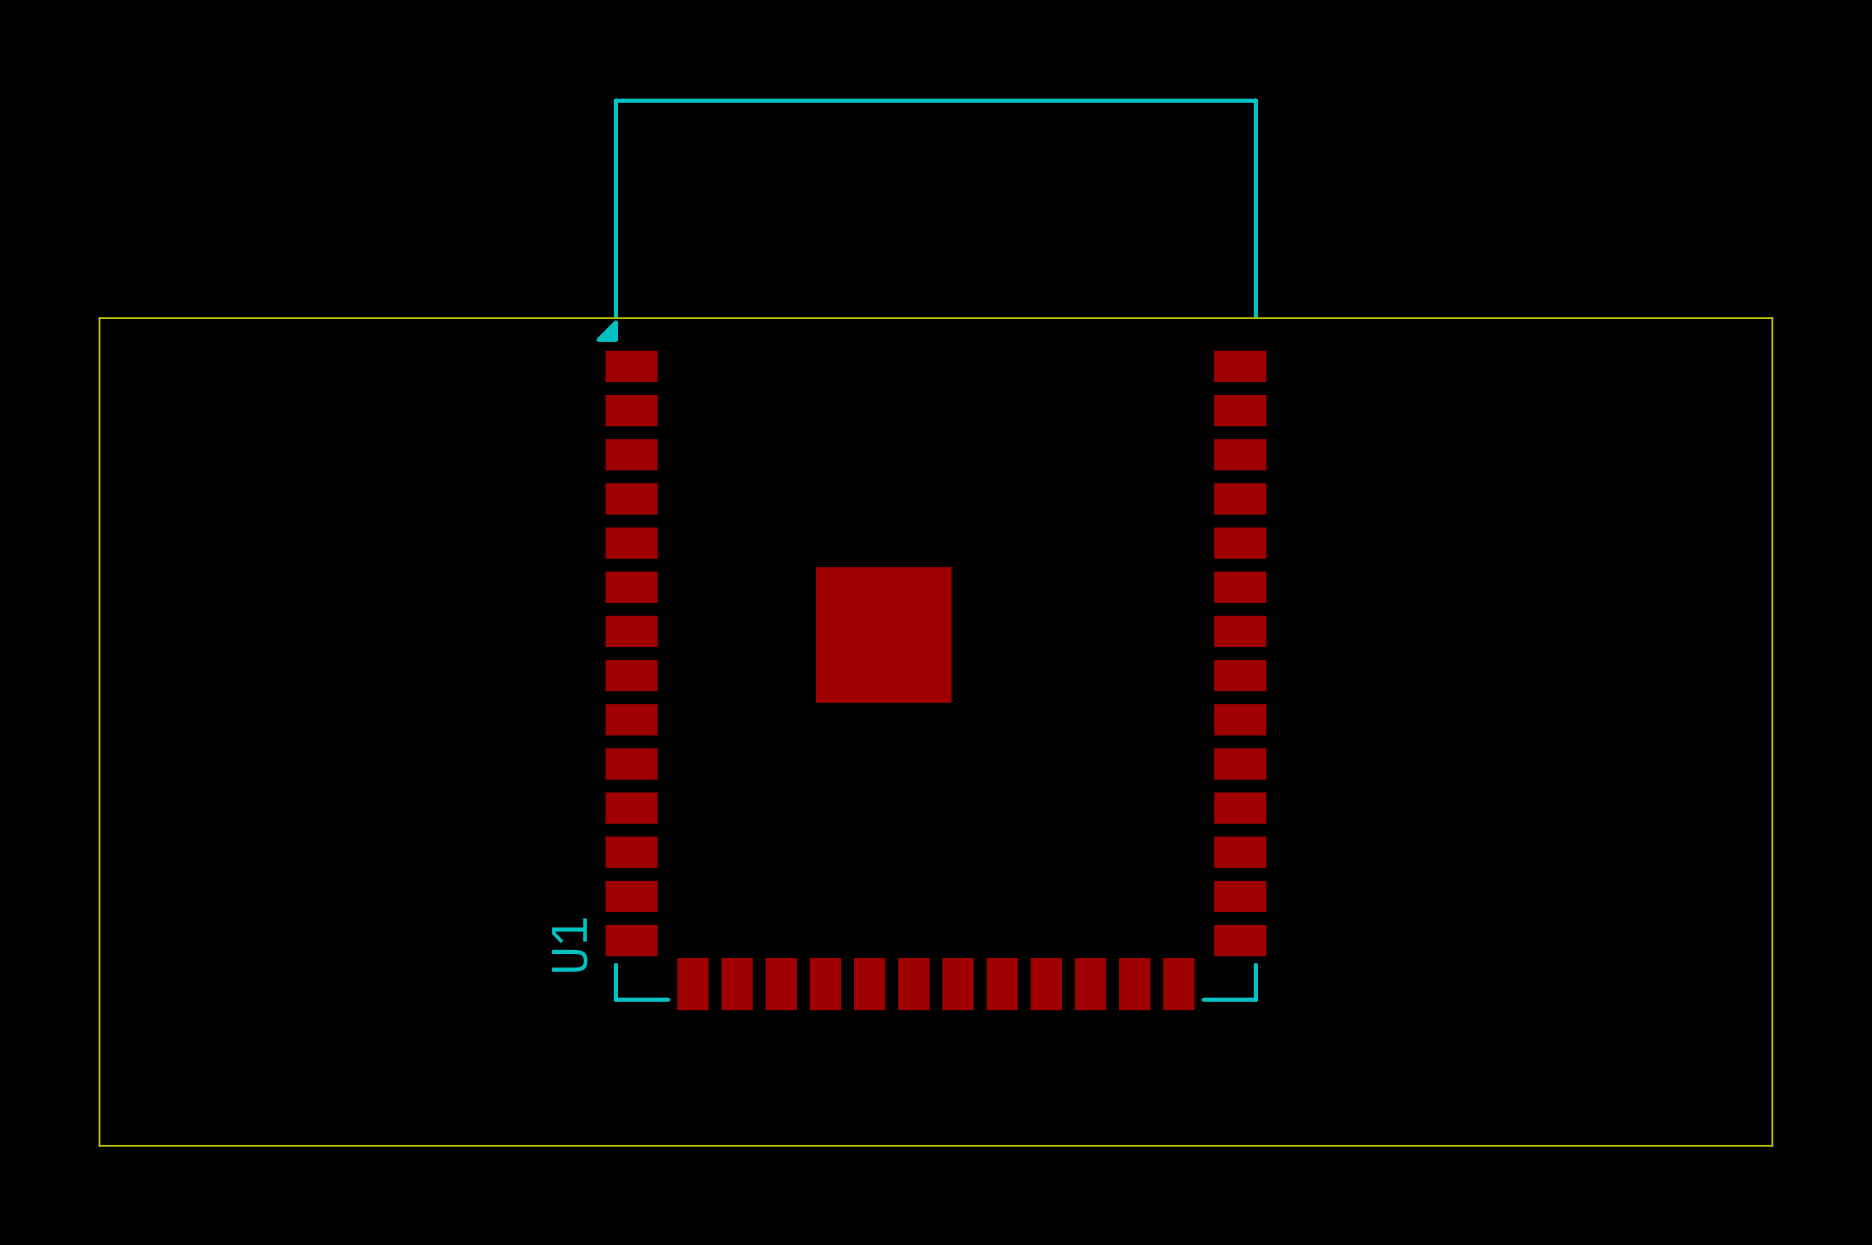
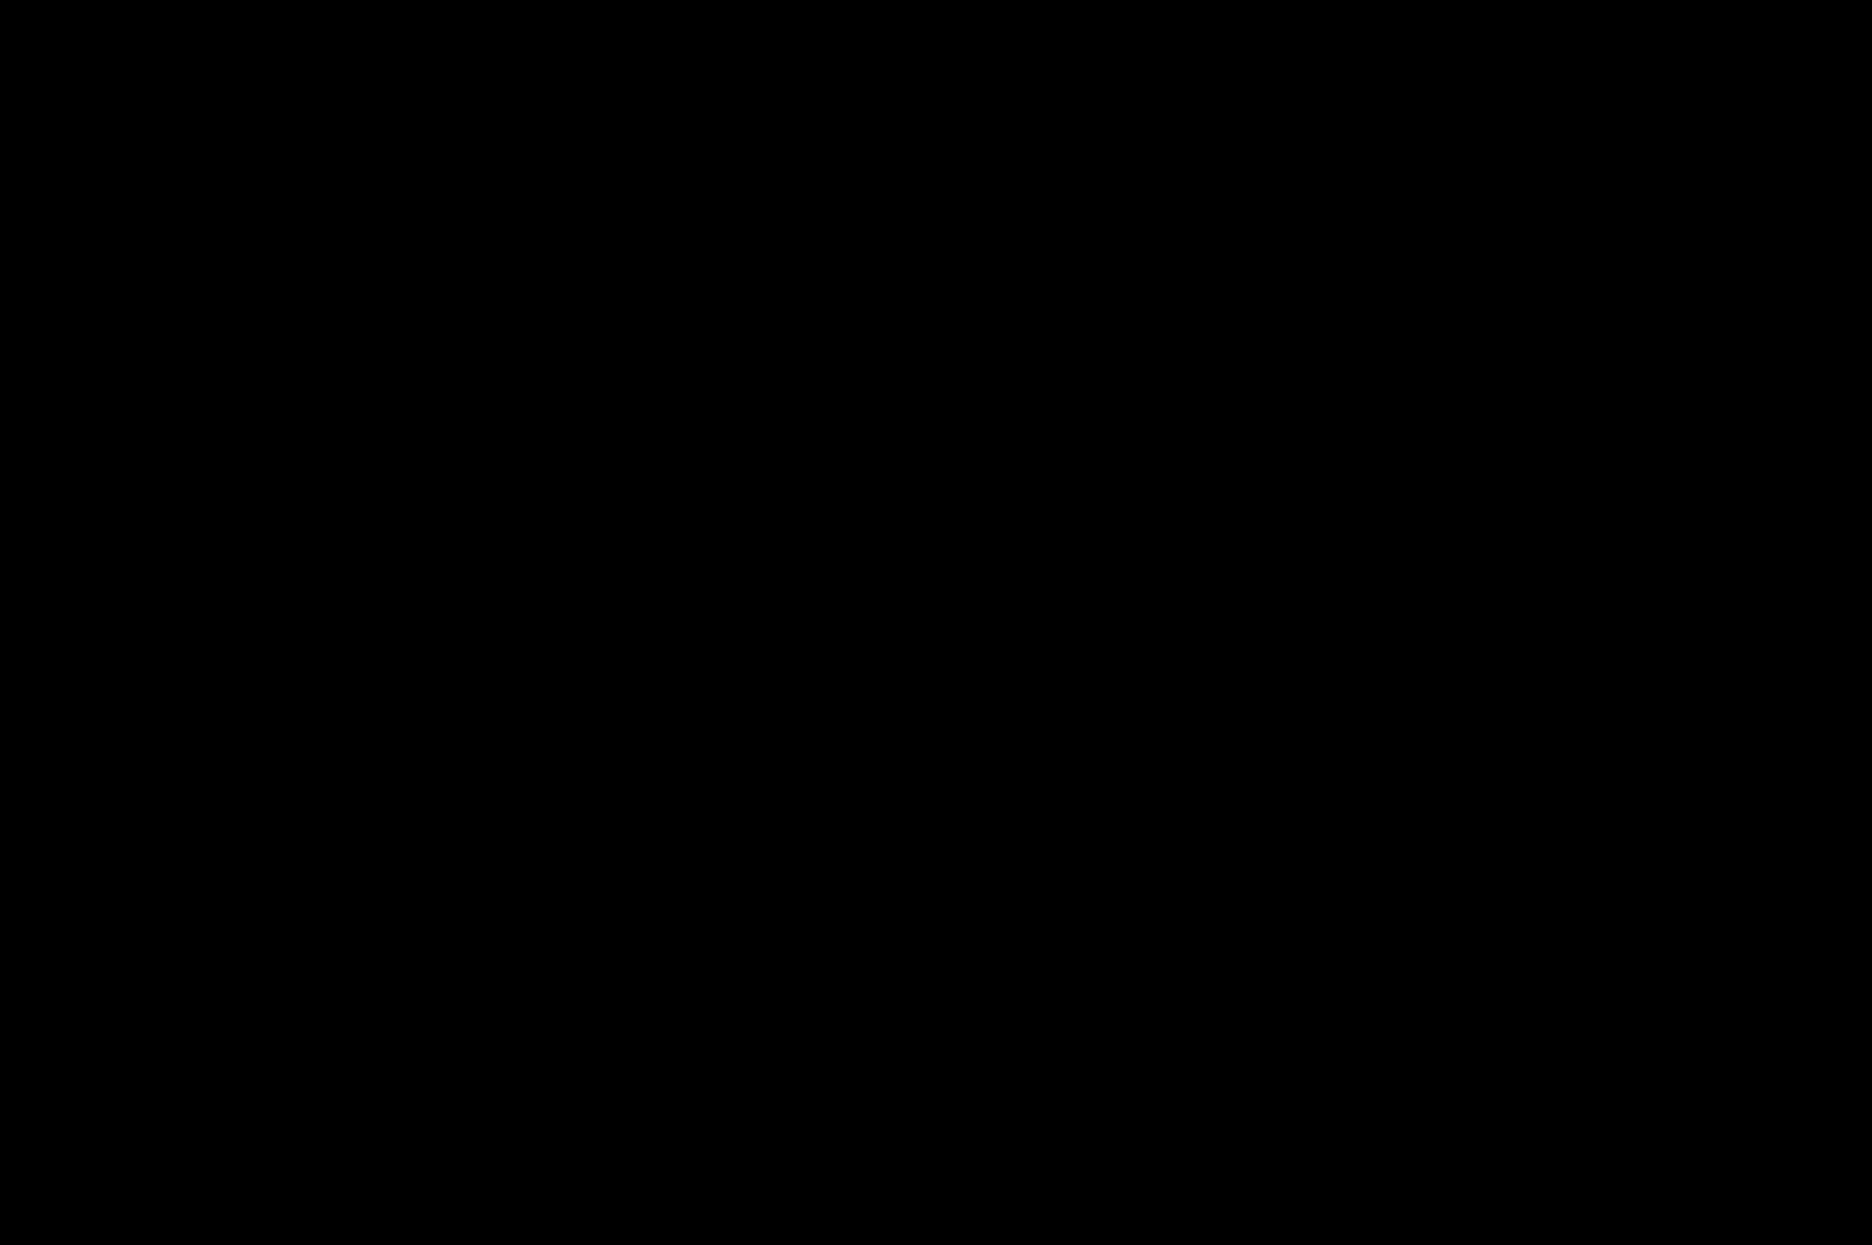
board edge: (99, 318) (1772, 318) (1772, 1145) (99, 1145) (99, 318) -> none
U1: (931, 554) -> none

